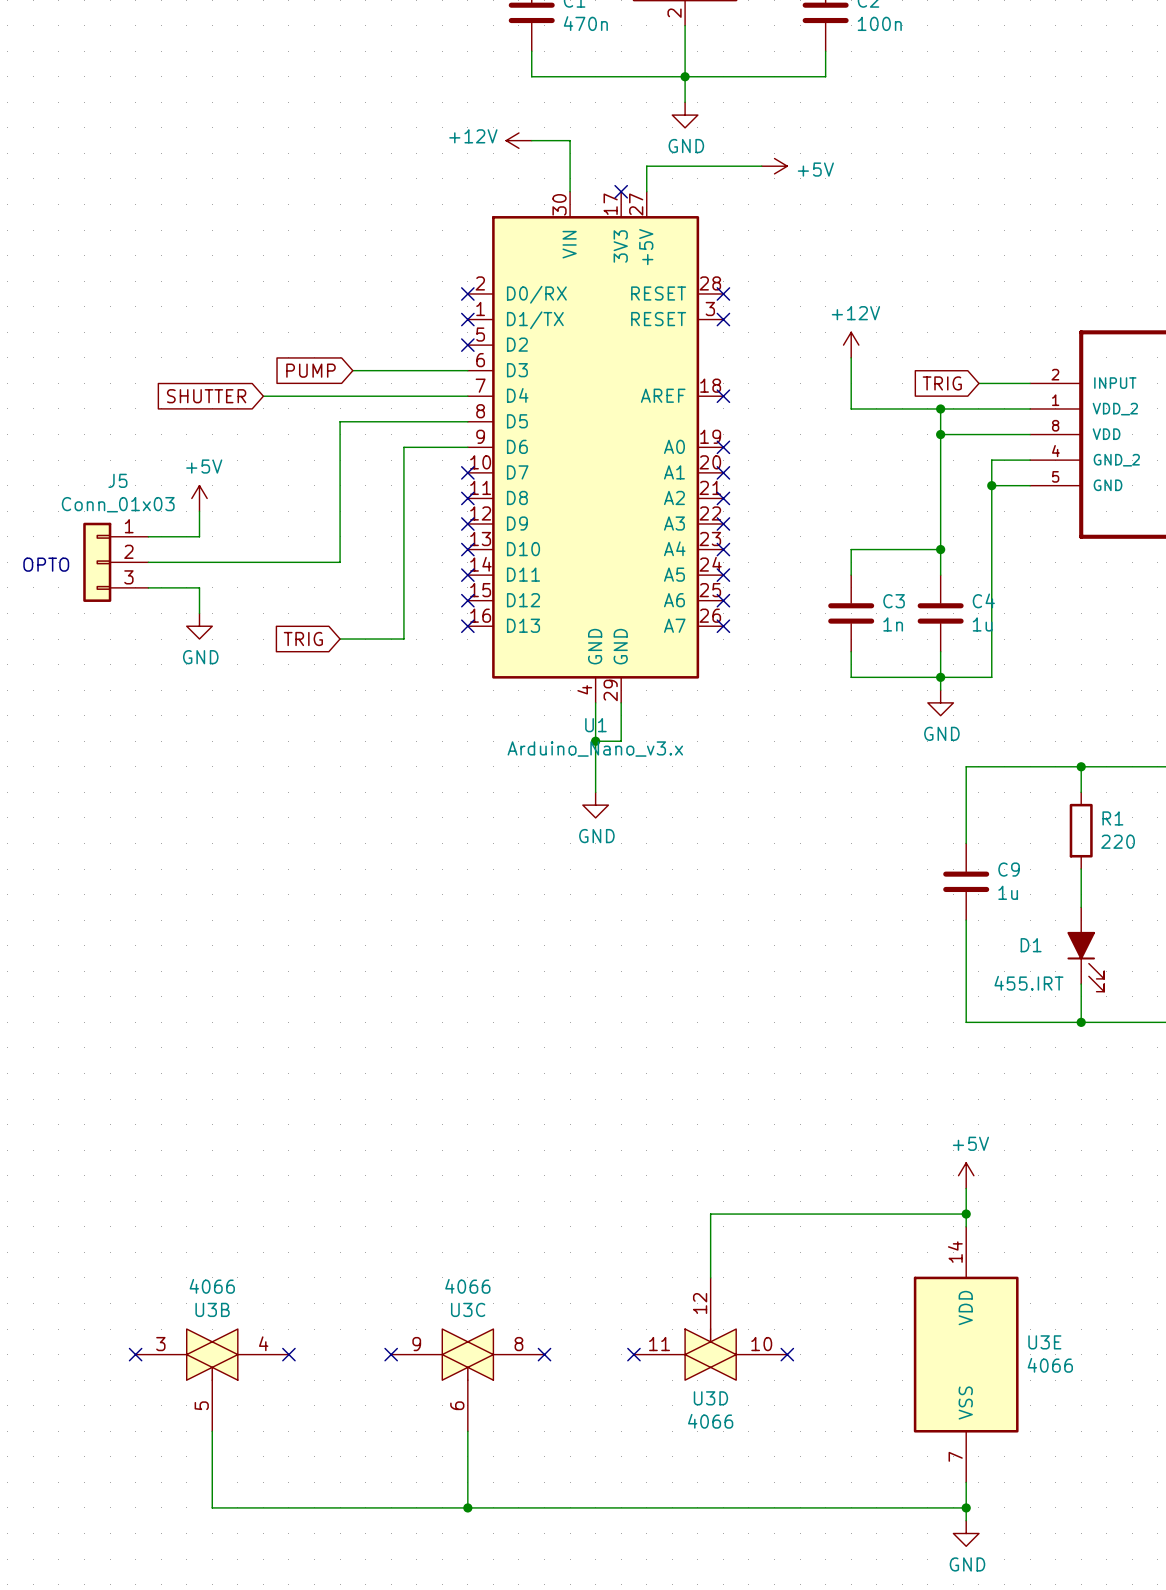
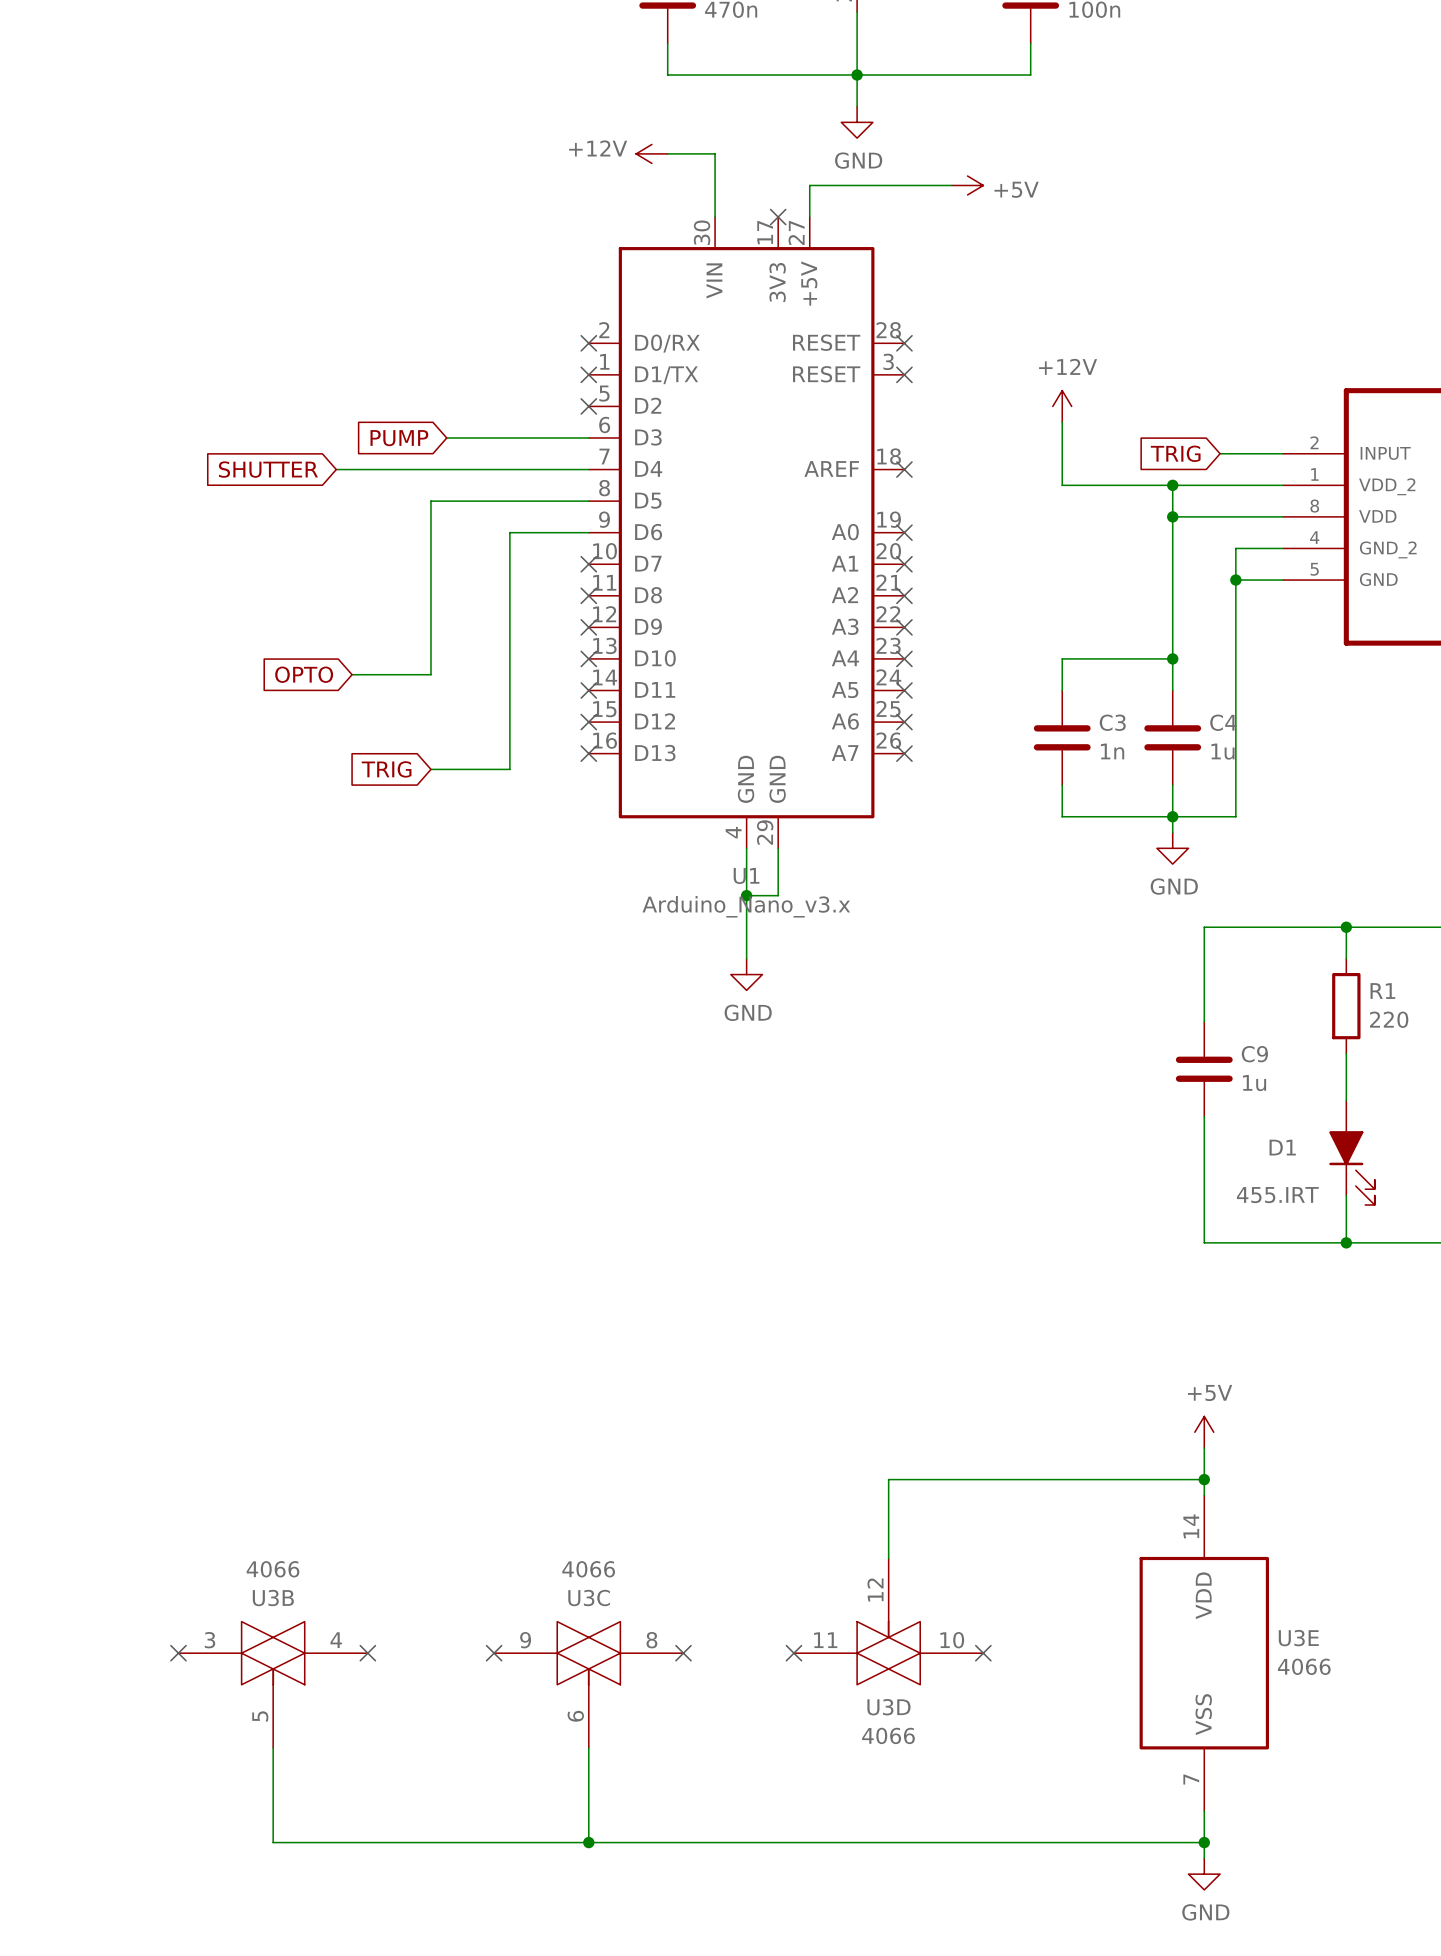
power symbol: +5V (199, 498) -> none
wire: (199, 511) (199, 536) (148, 536) -> none
J5: Conn_01x03 (115, 562) -> none
wire: (148, 562) (276, 562) -> none
global label: none -> OPTO (304, 674)
text: OPTO (46, 564) -> none
wire: (148, 587) (199, 587) (199, 613) -> none
power symbol: GND (199, 626) -> none

